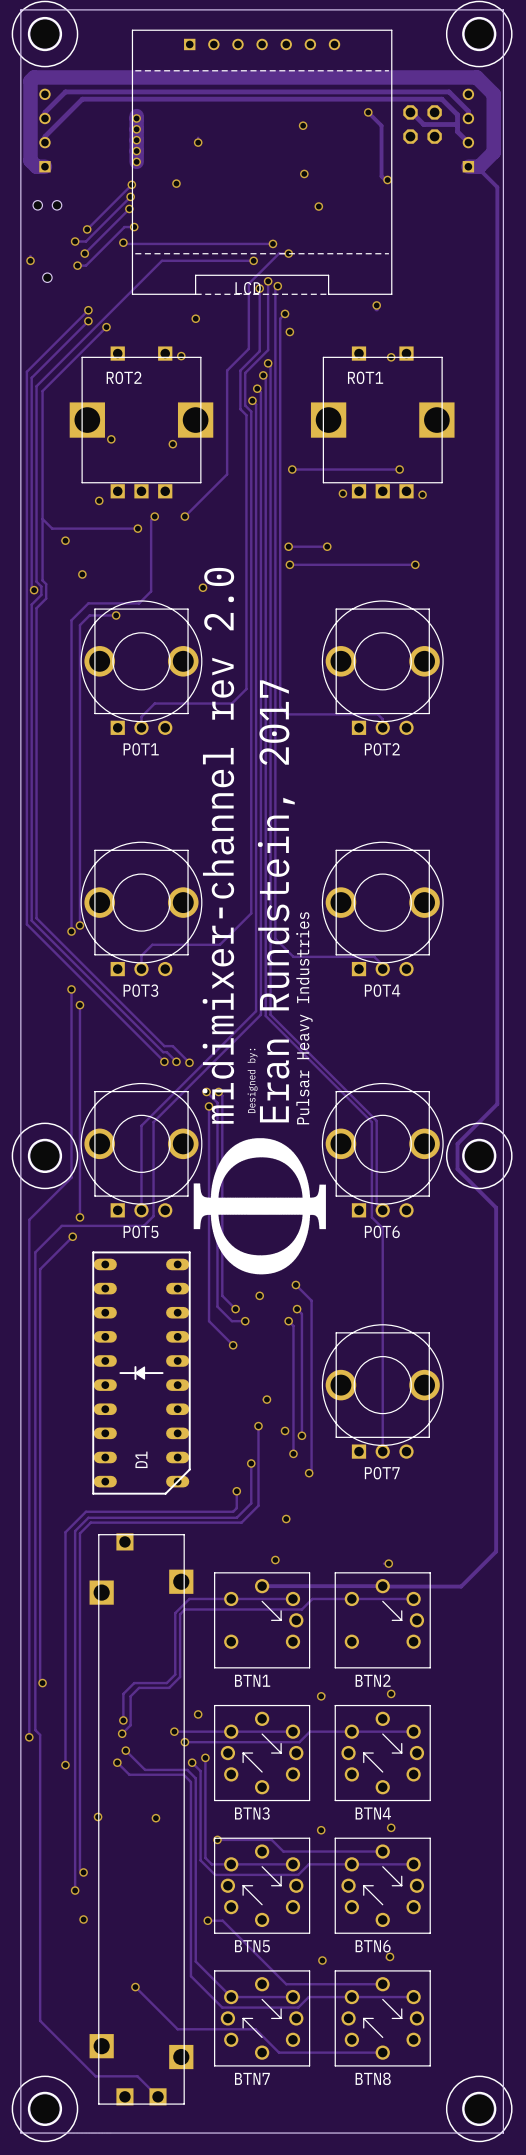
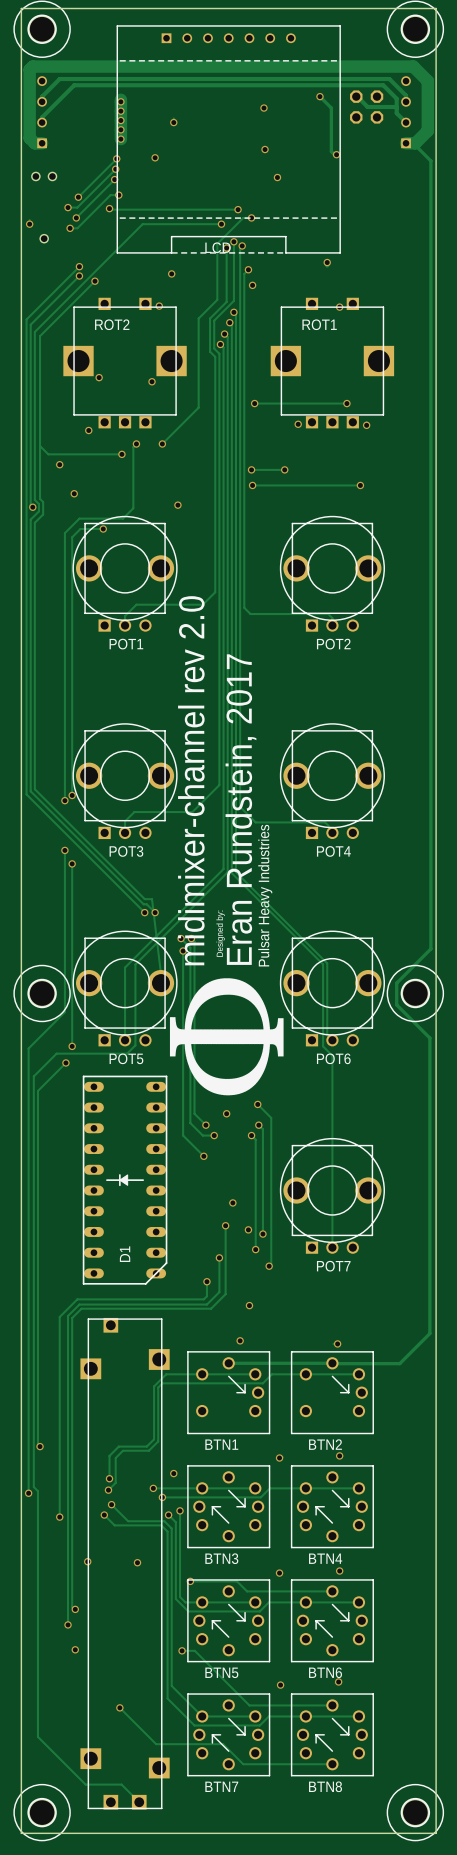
track: (172, 1046) (189, 1062) -> (152, 899) (161, 976)
via: (189, 1062) -> none

